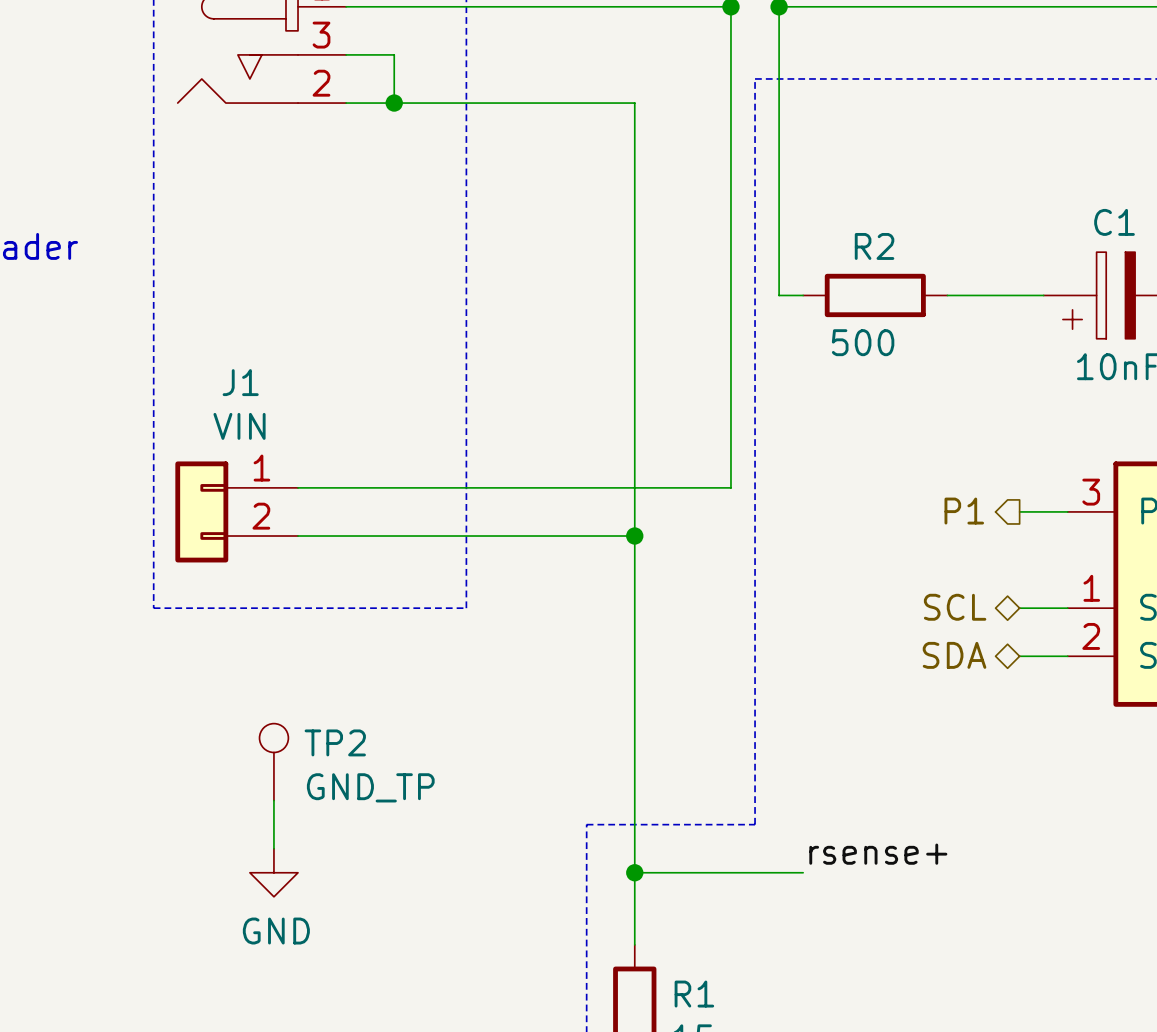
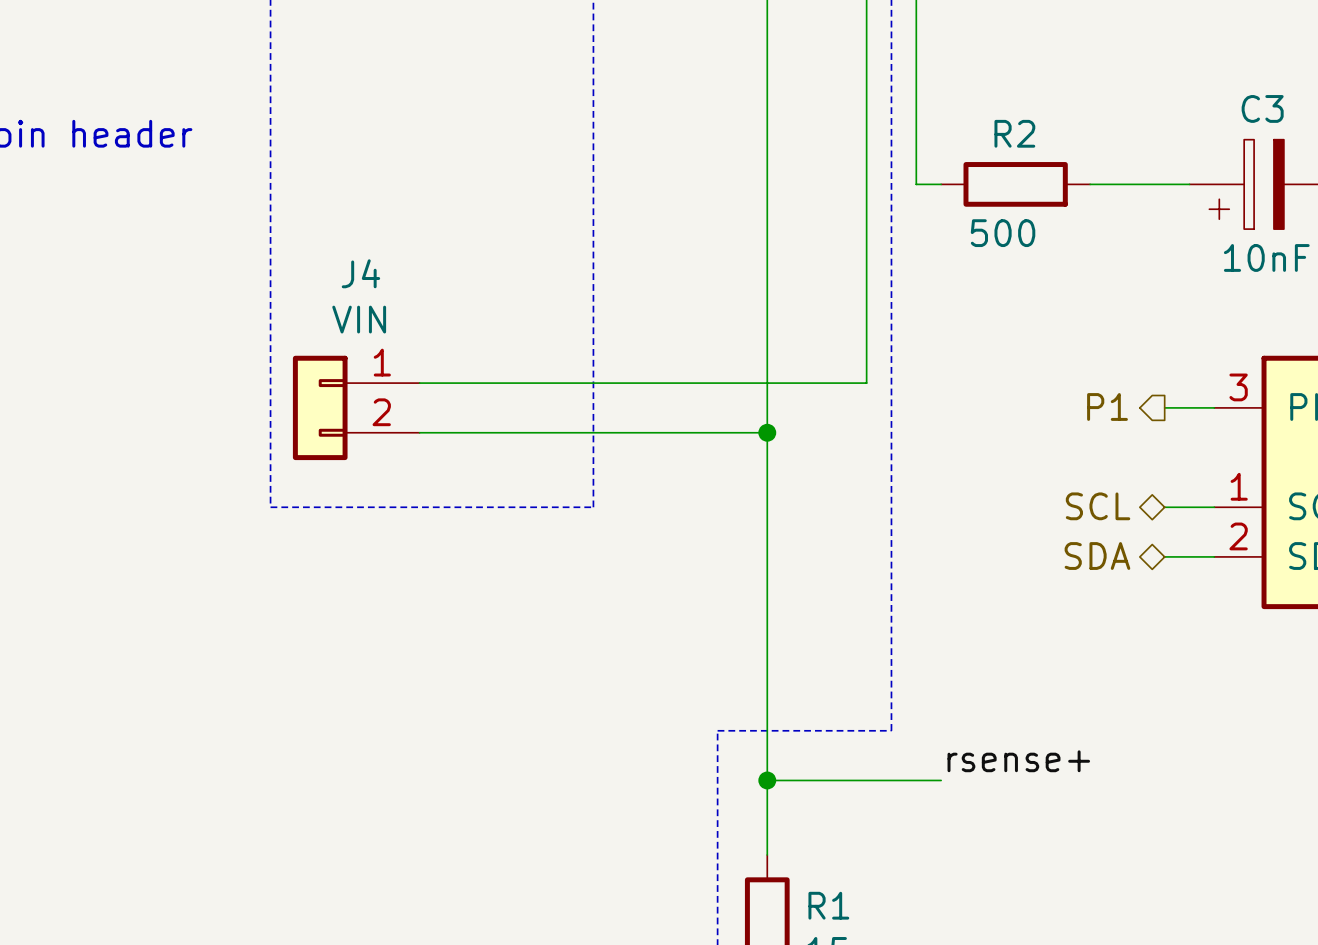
C1 name: C1 (1114, 222) -> C3 (1262, 108)
J1 name: J1 (240, 382) -> J4 (360, 273)
TP2: GND_TP (273, 762) -> none
wire: (273, 800) (273, 848) -> none
power symbol: GND (273, 872) -> none

